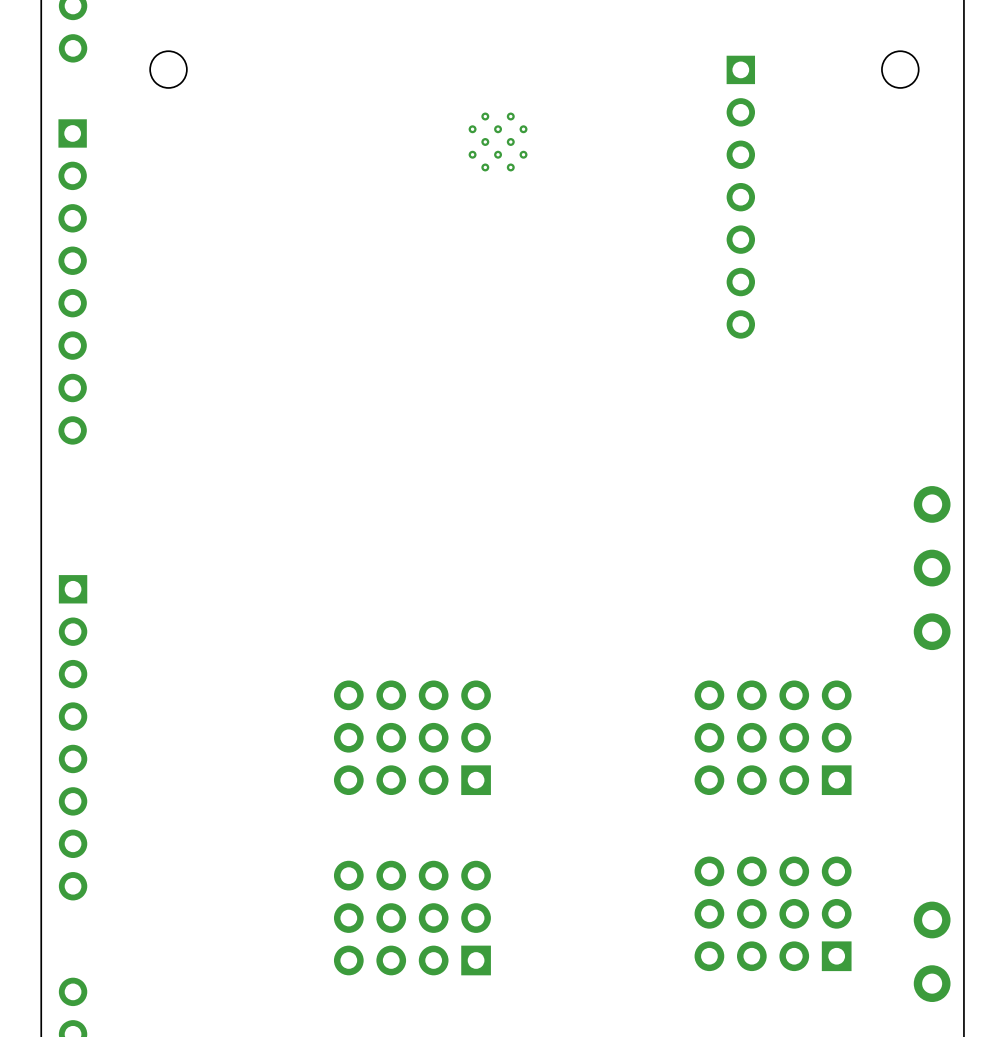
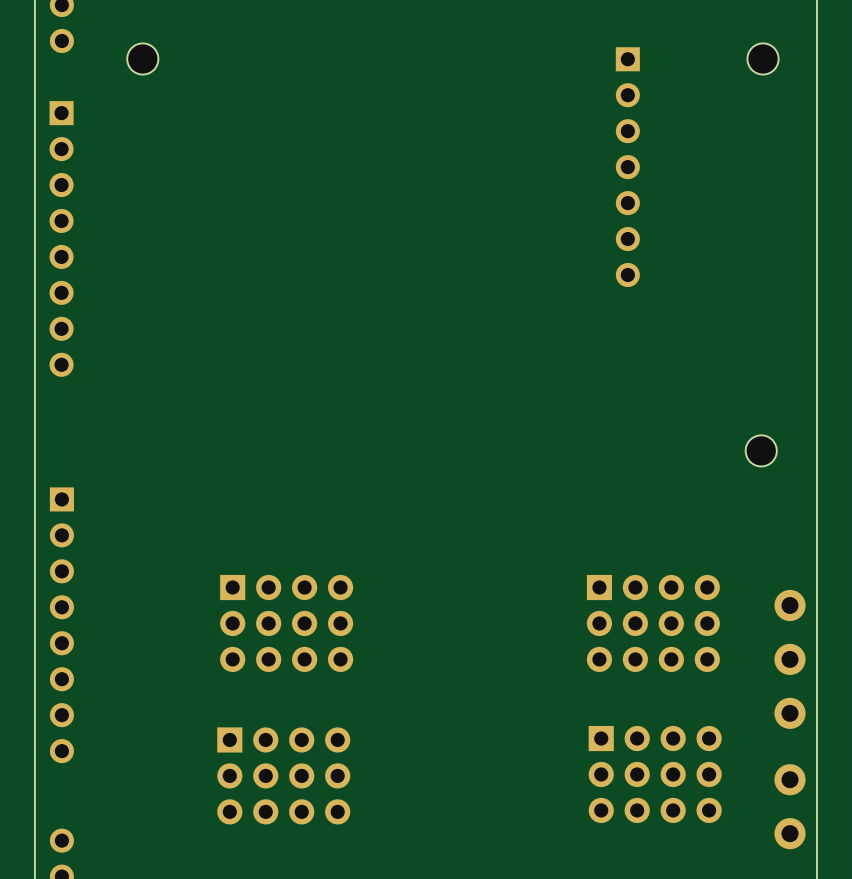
part: (498, 141) -> none
part: none -> (761, 450)
part position: (932, 568) -> (790, 659)
part rotation: 0° (412, 737) -> 180° (286, 623)
part rotation: 0° (773, 737) -> 180° (653, 623)
part rotation: 0° (773, 913) -> 180° (655, 774)
part rotation: 0° (412, 918) -> 180° (283, 775)

